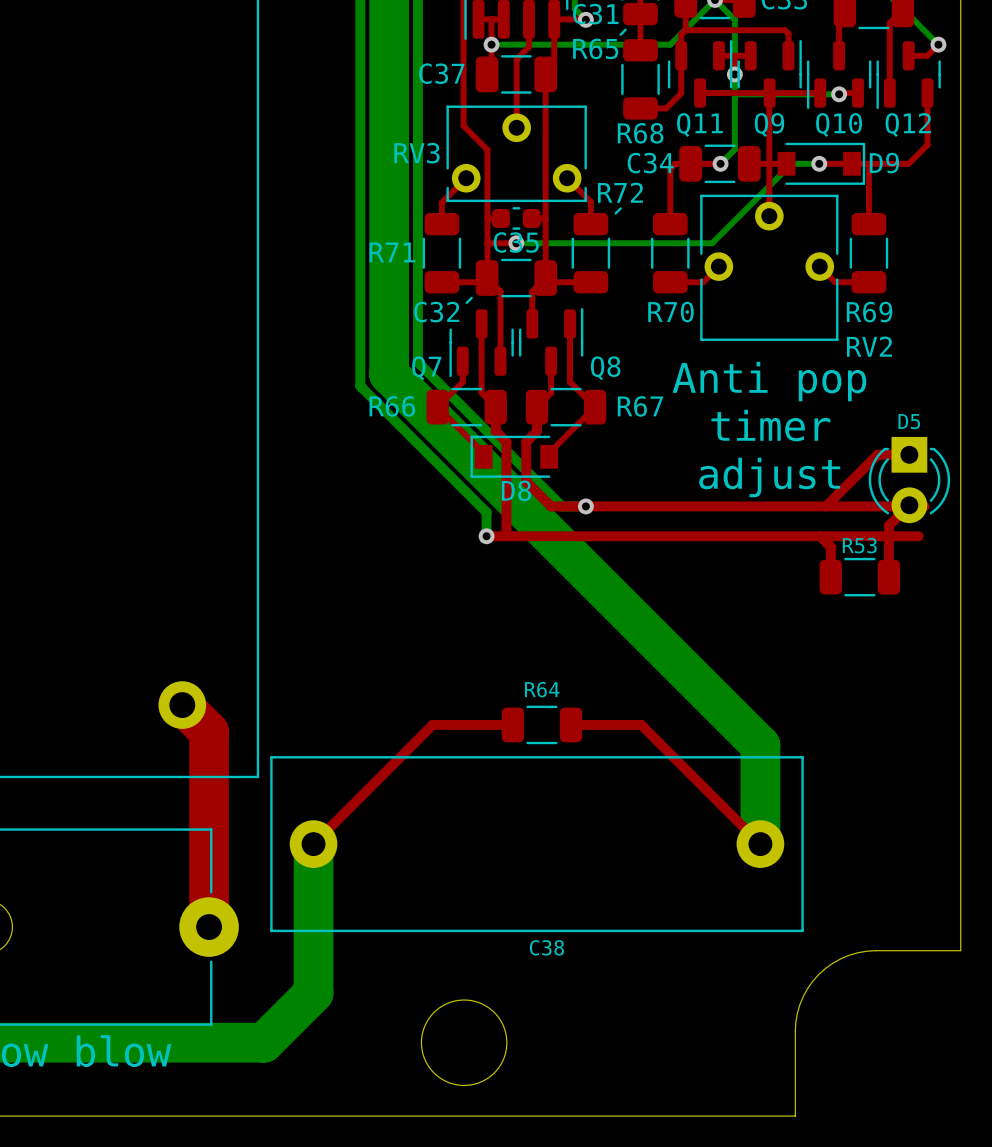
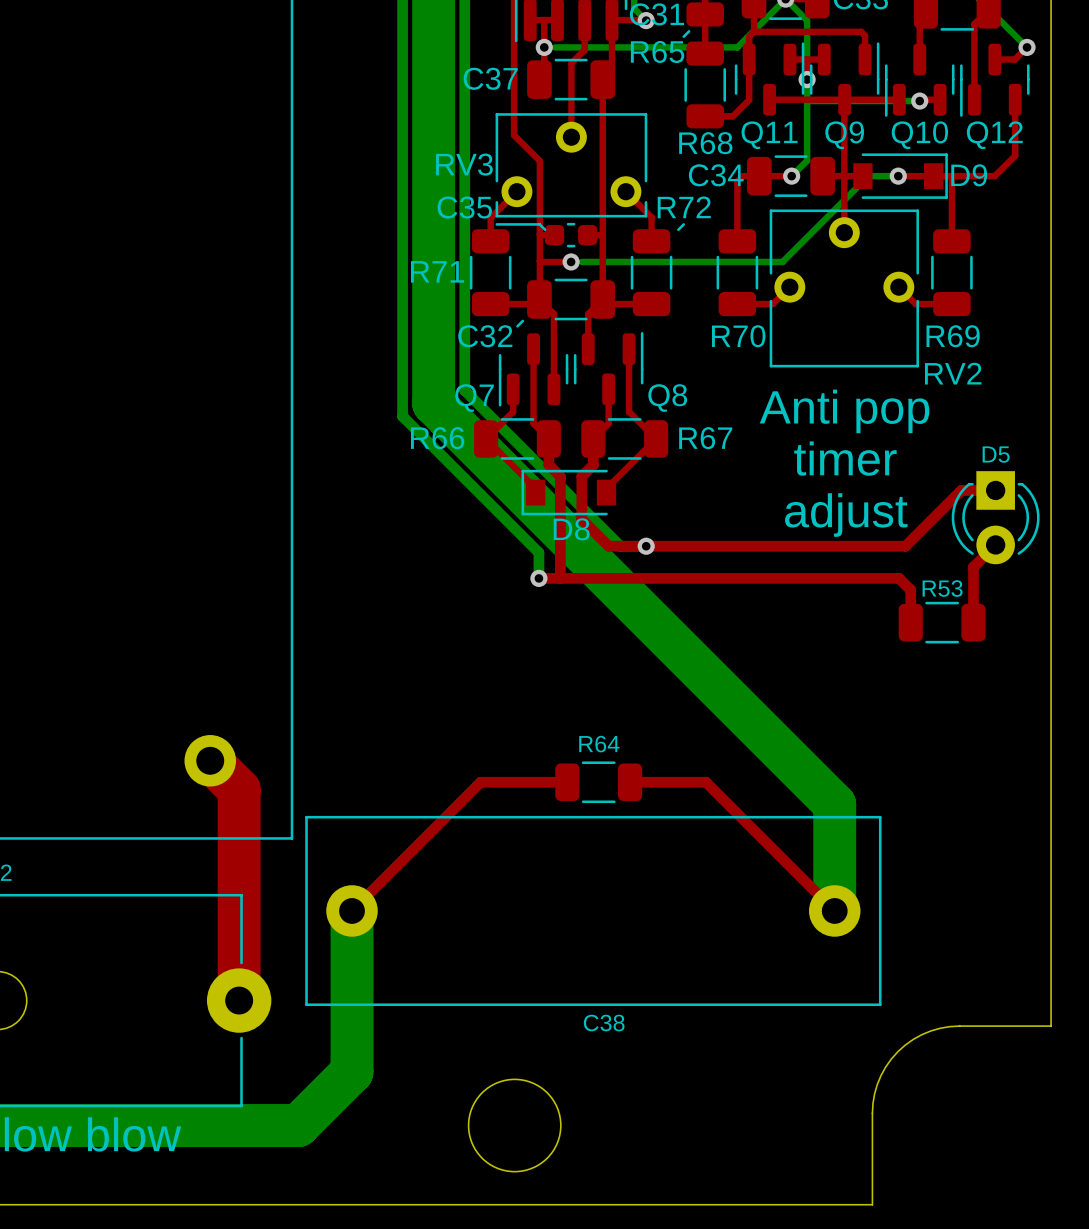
line: none -> (496, 224) (539, 224) (545, 229)
C35 name position: C35 (516, 242) -> C35 (464, 207)
top track: (825, 506) (924, 506) -> none
top track: (820, 536) (918, 536) -> none

